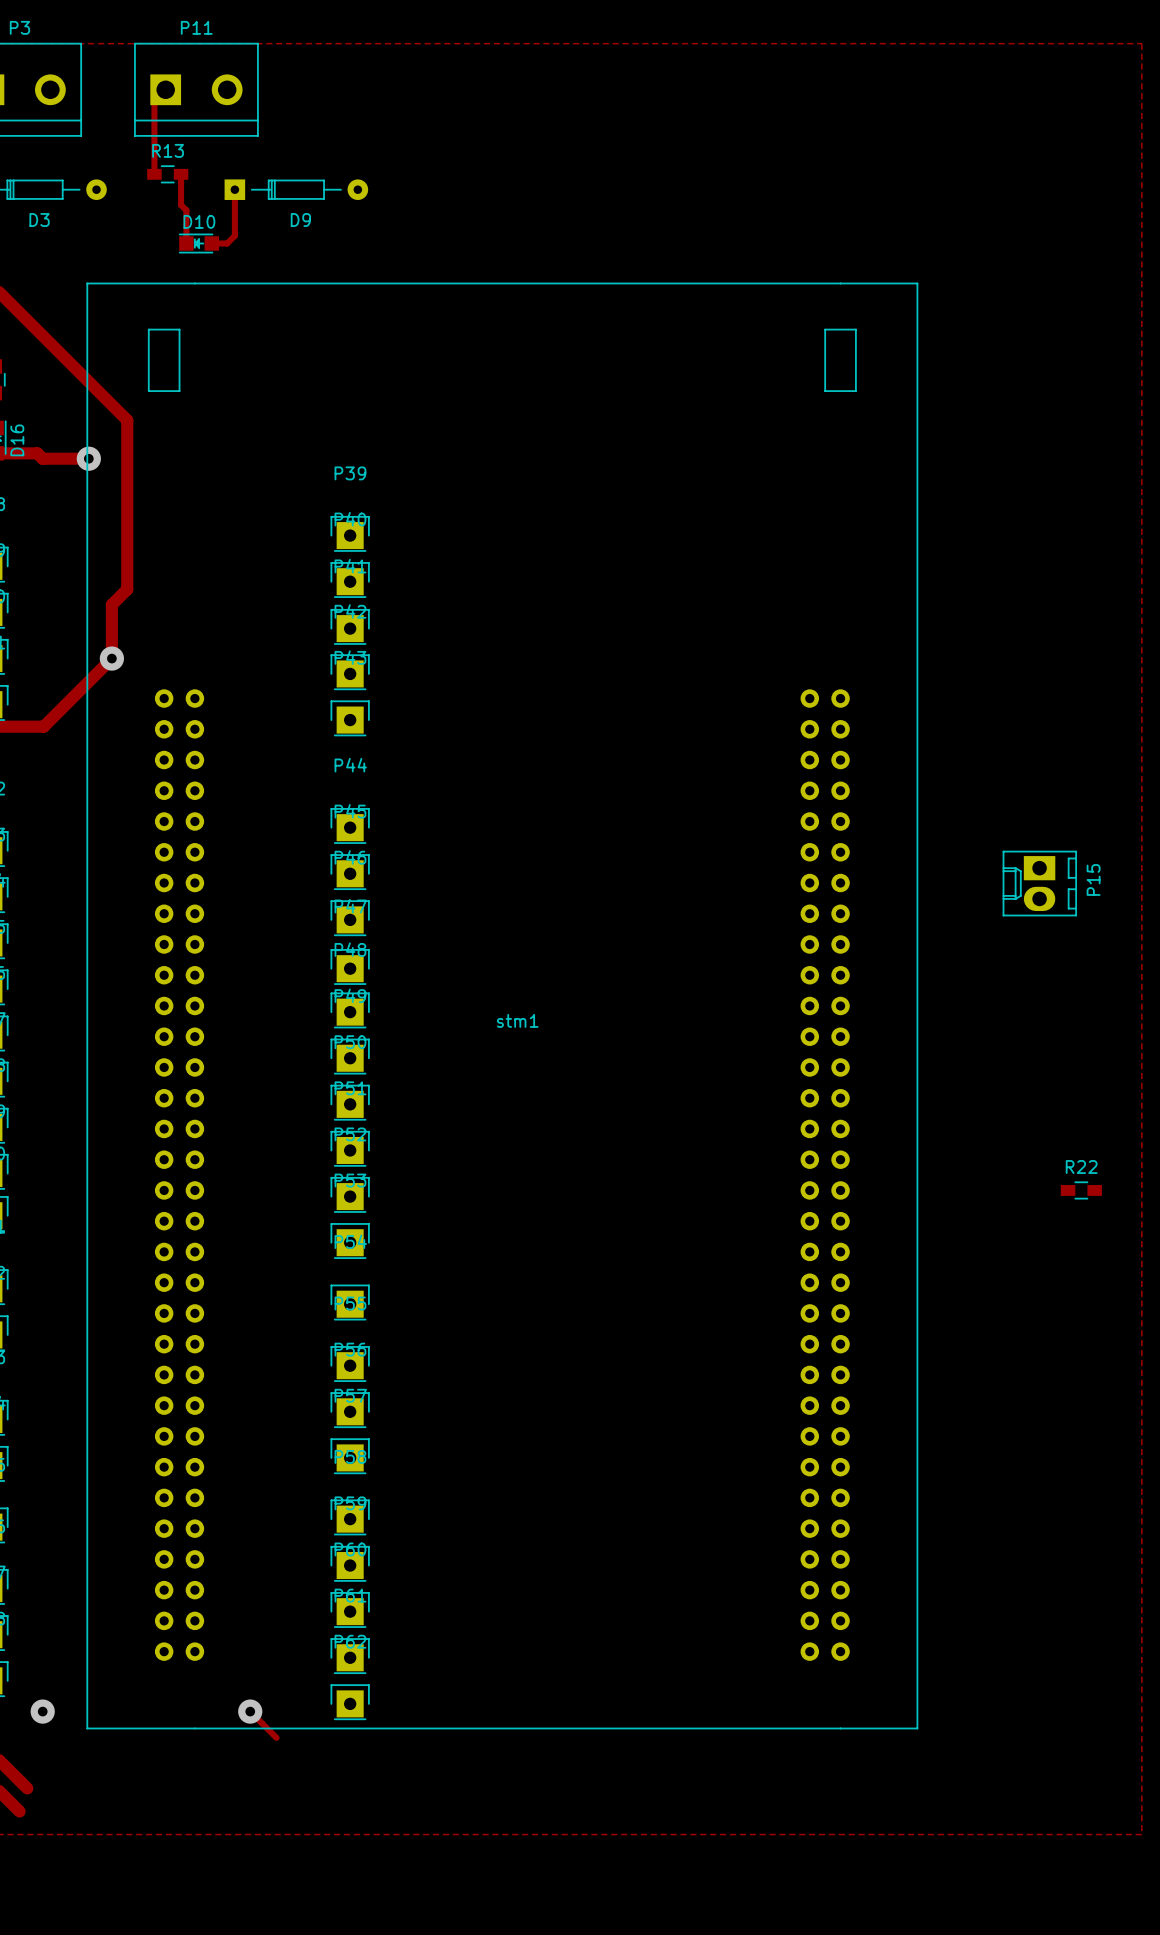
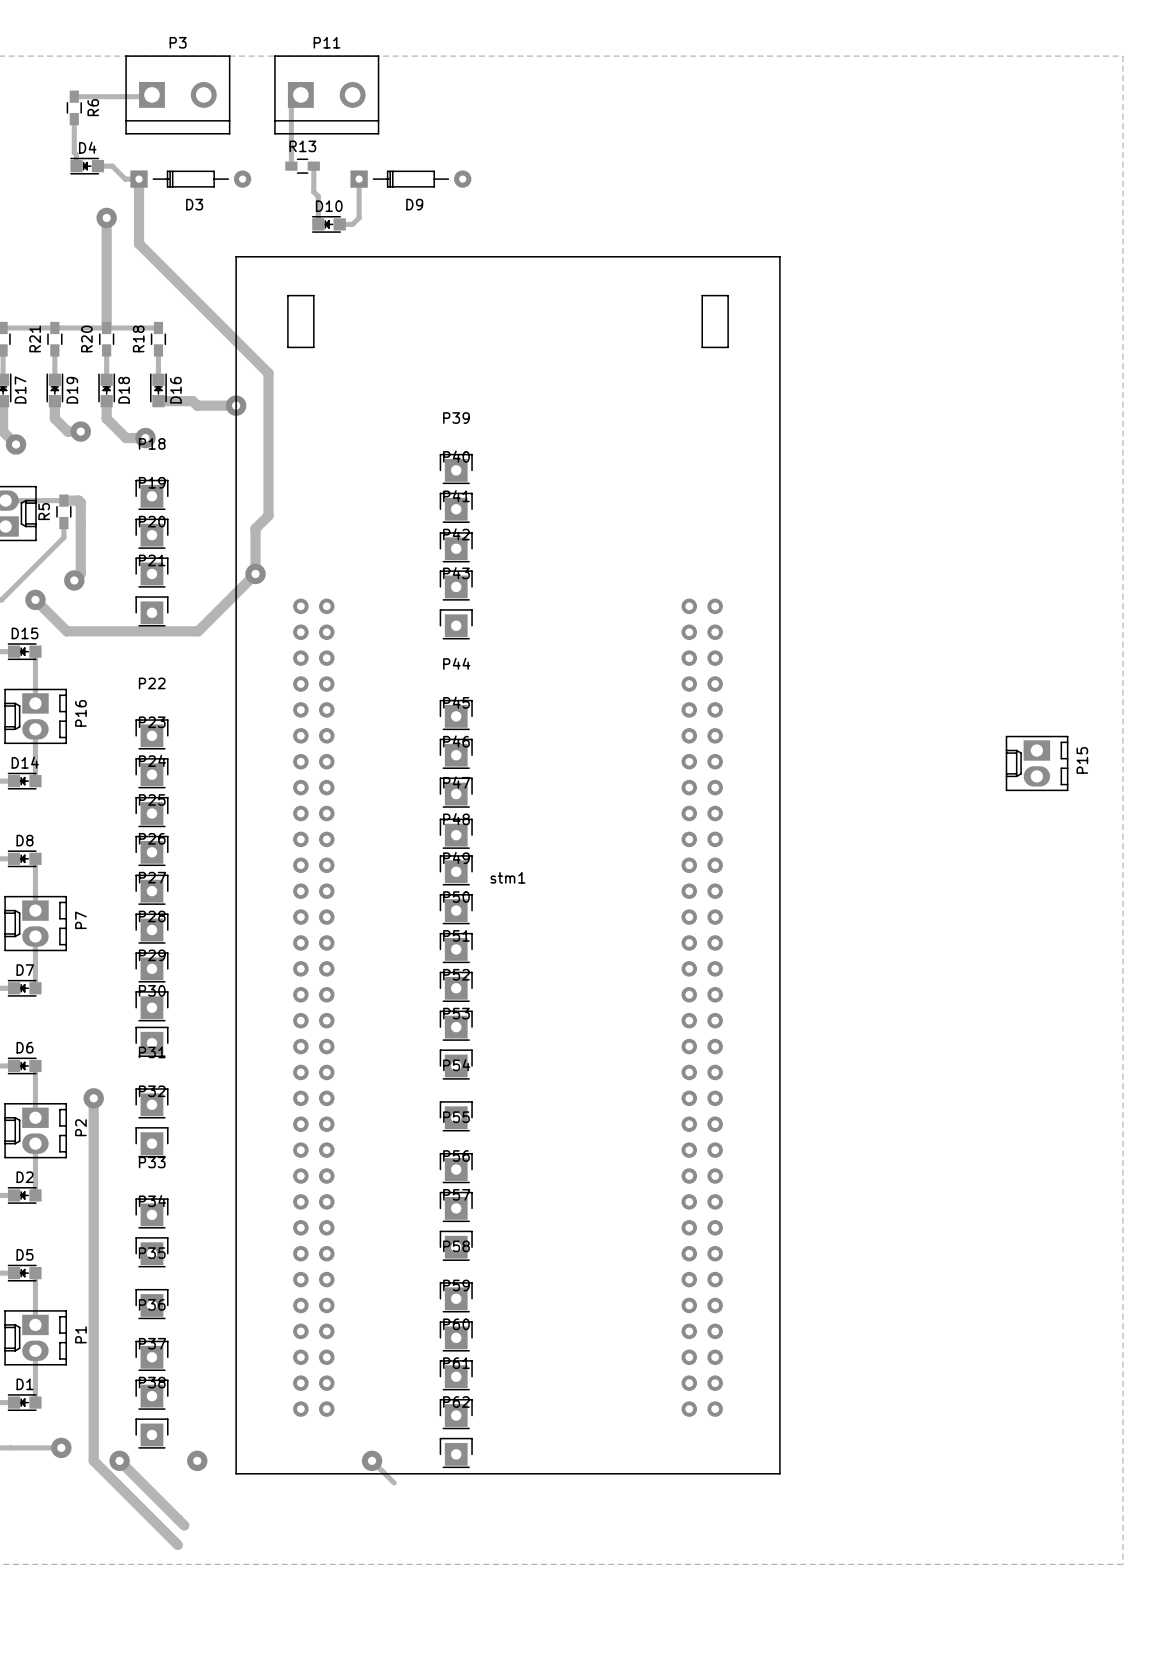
stm1 footprint: [86, 282, 919, 1730] -> [235, 256, 781, 1475]
R22: (1081, 1190) -> none

